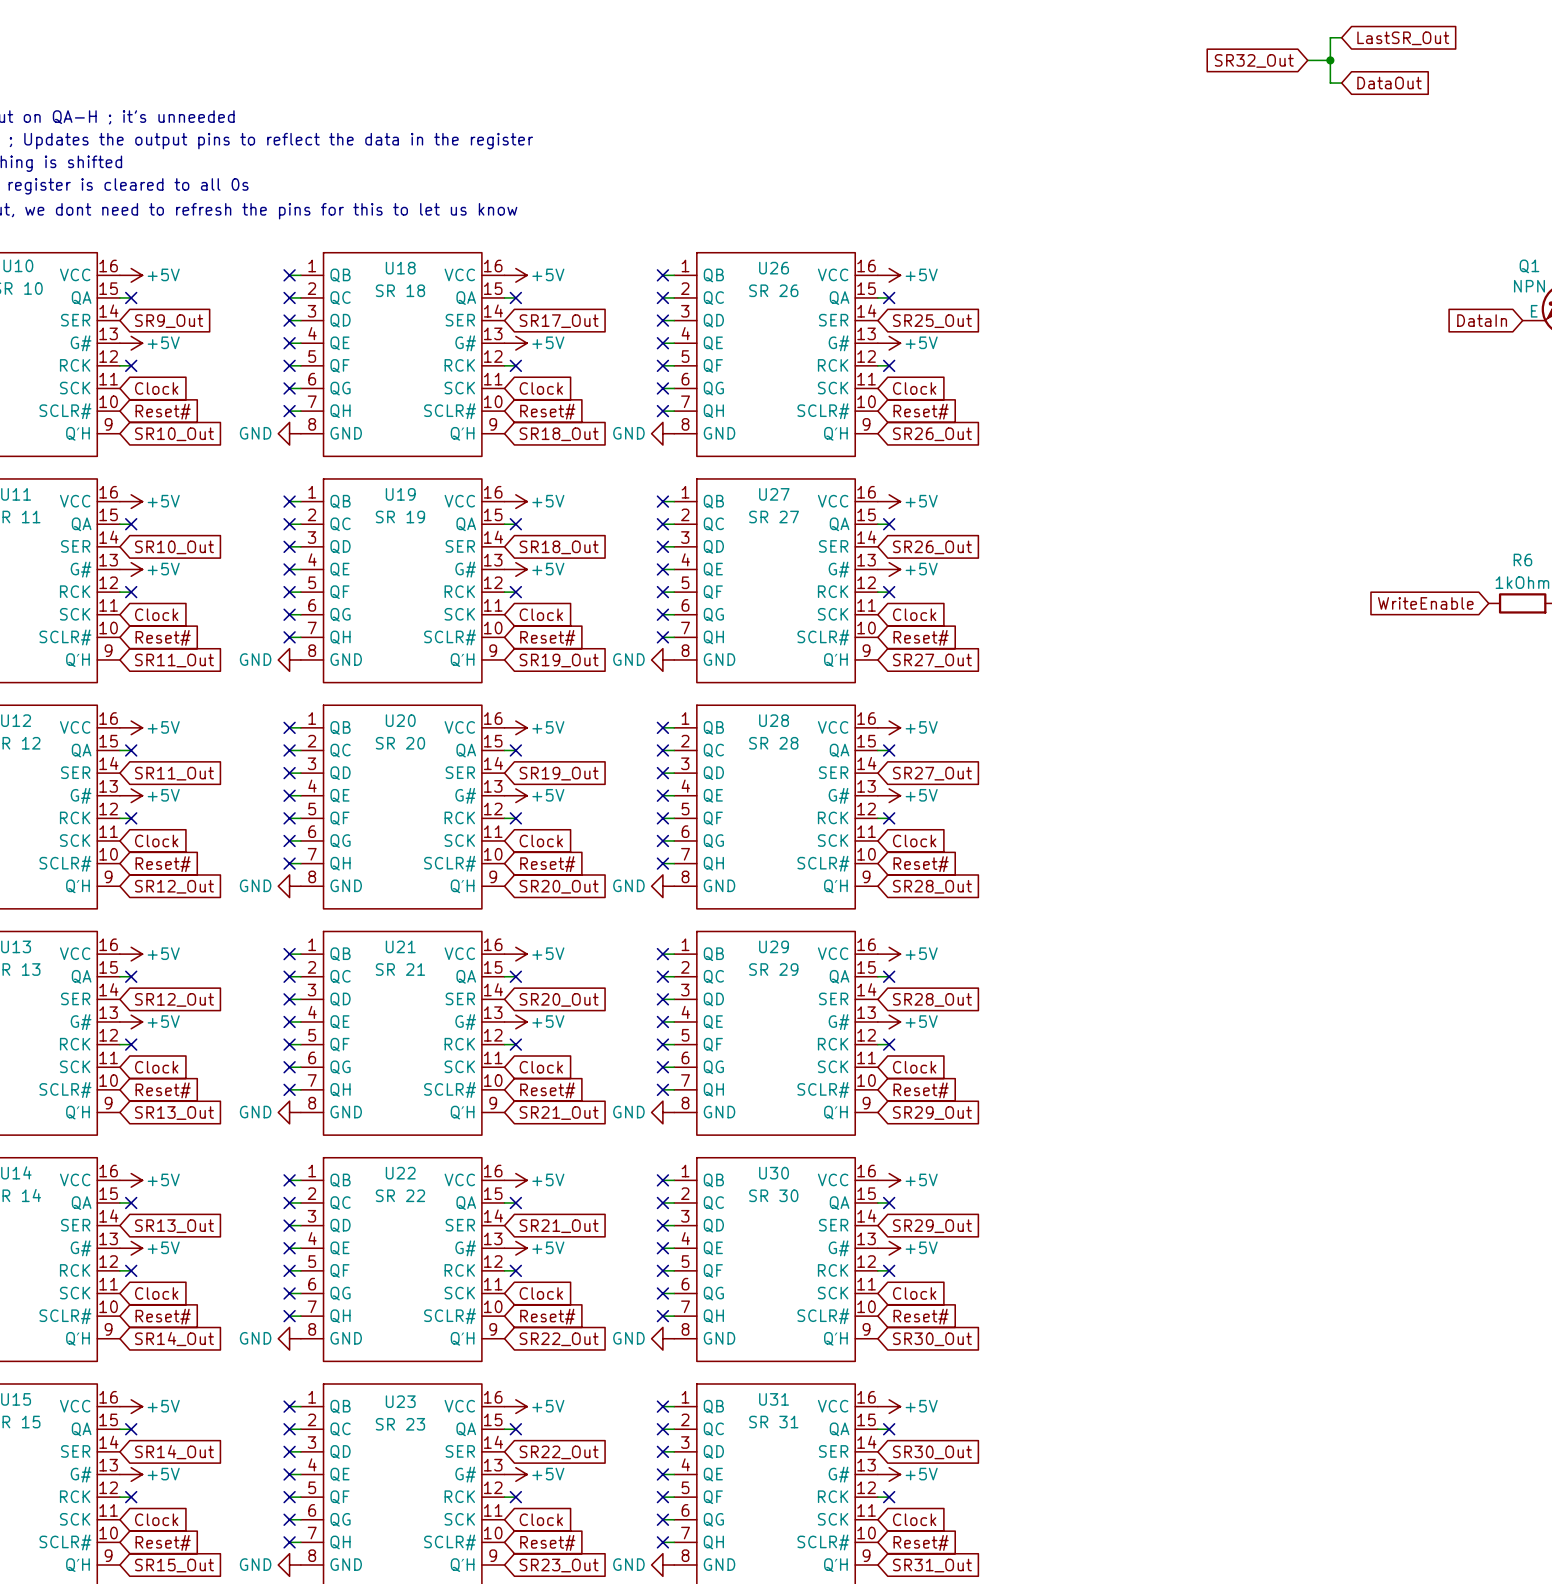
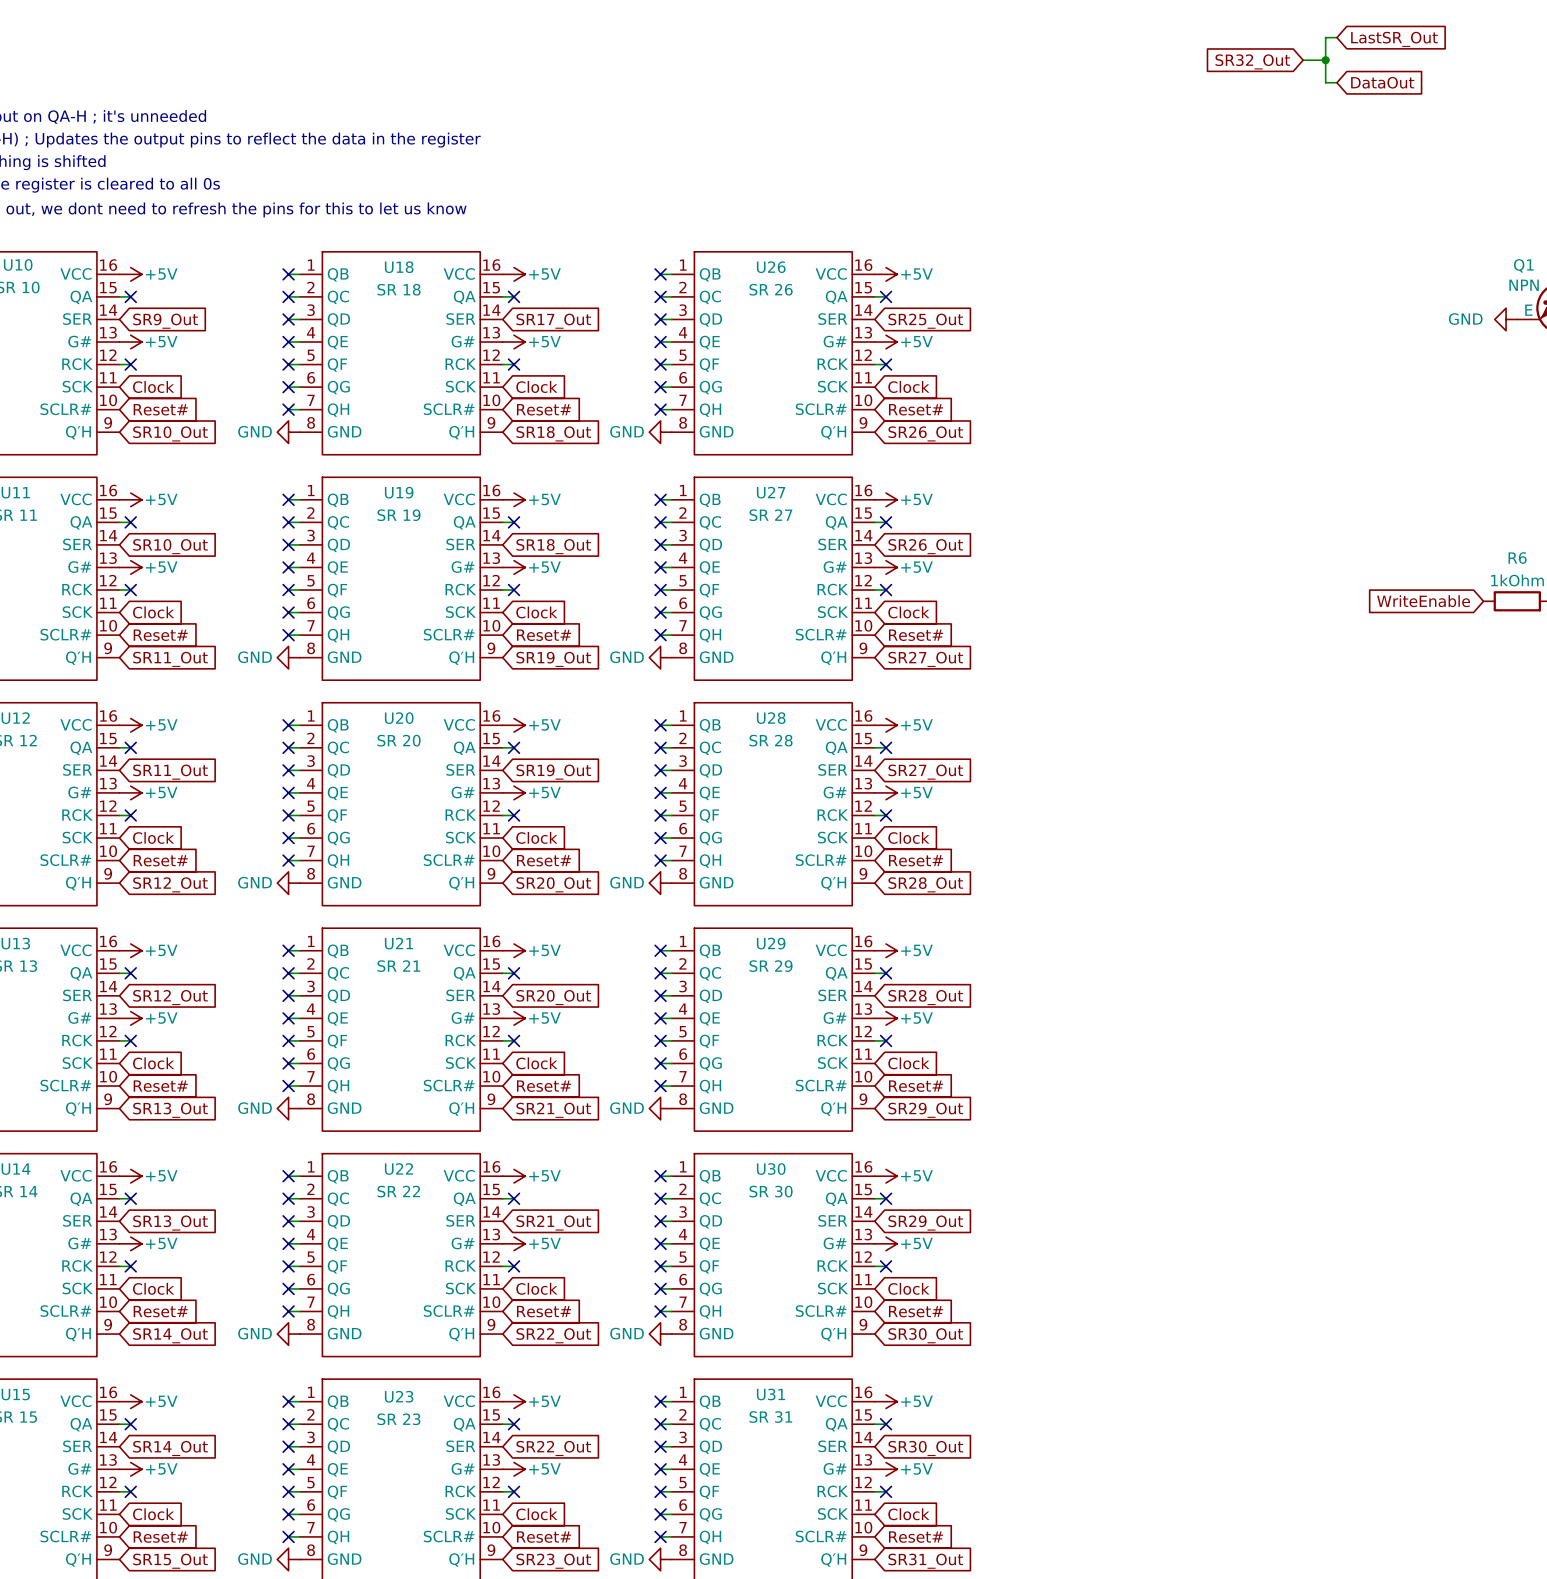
global label: DataIn (1482, 320) -> none
power symbol: none -> GND (1506, 319)

